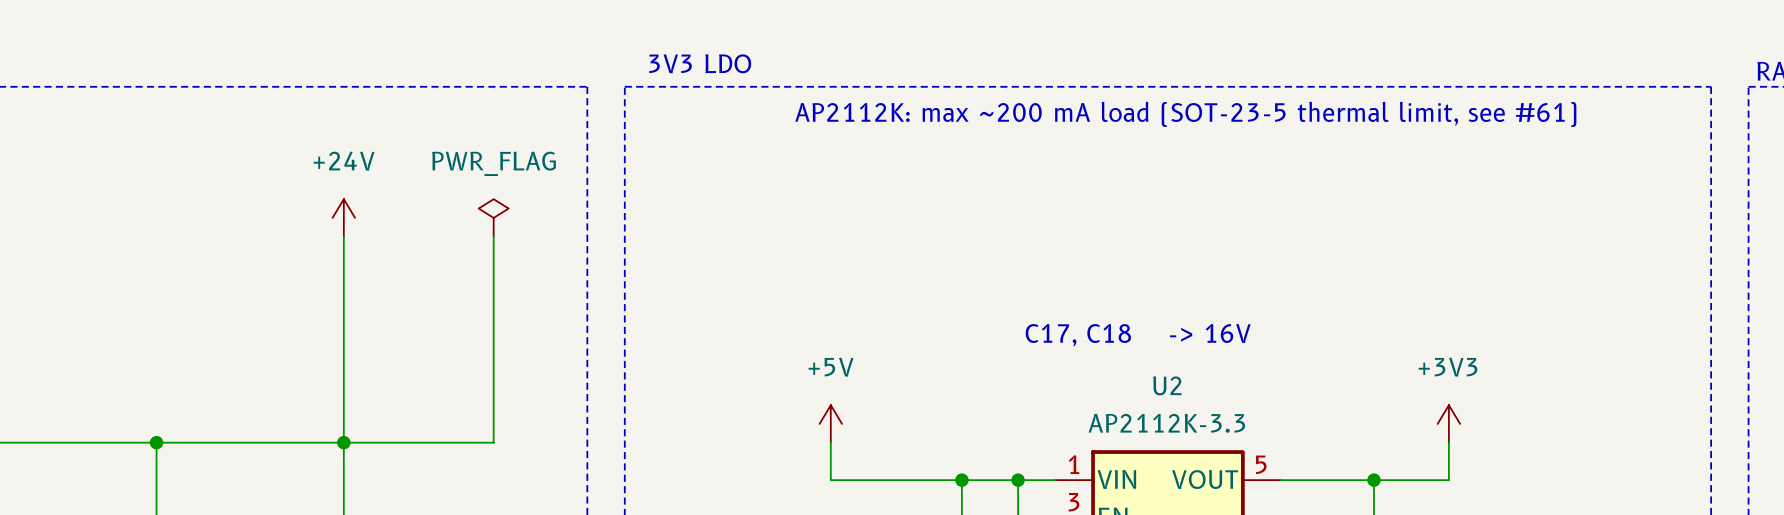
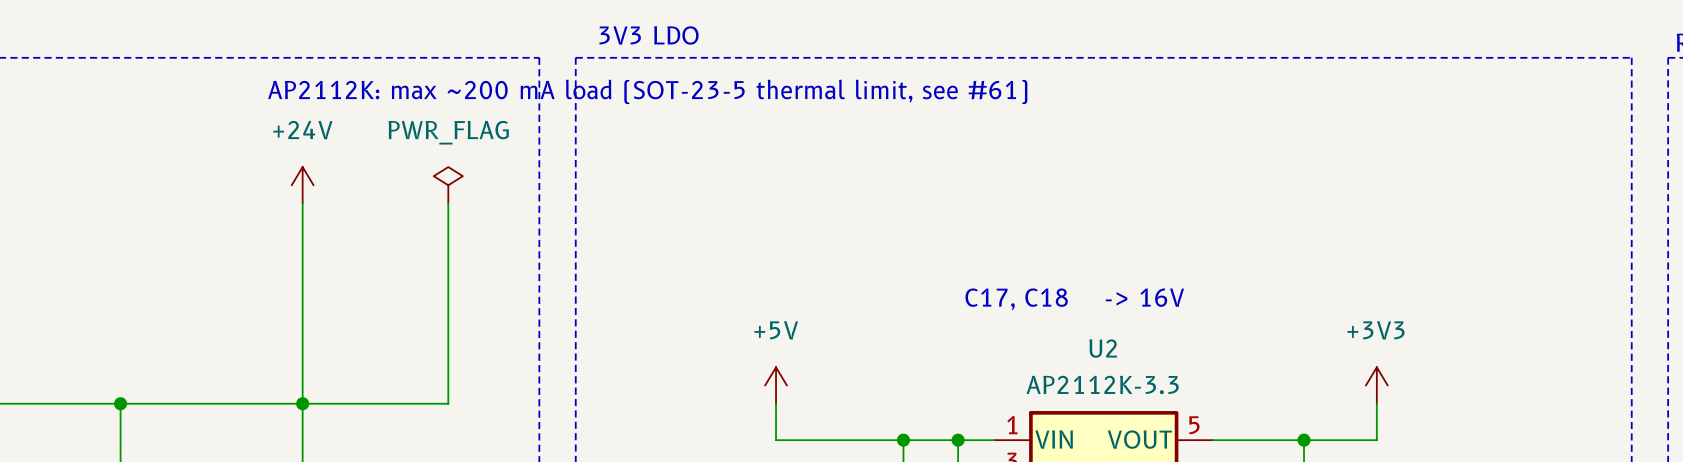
text: AP2112K: max ~200 mA load (SOT-23-5 thermal limit, see #61) (1185, 114) -> none
text: none -> AP2112K: max ~200 mA load (SOT-23-5 thermal limit, see #61) (647, 91)

